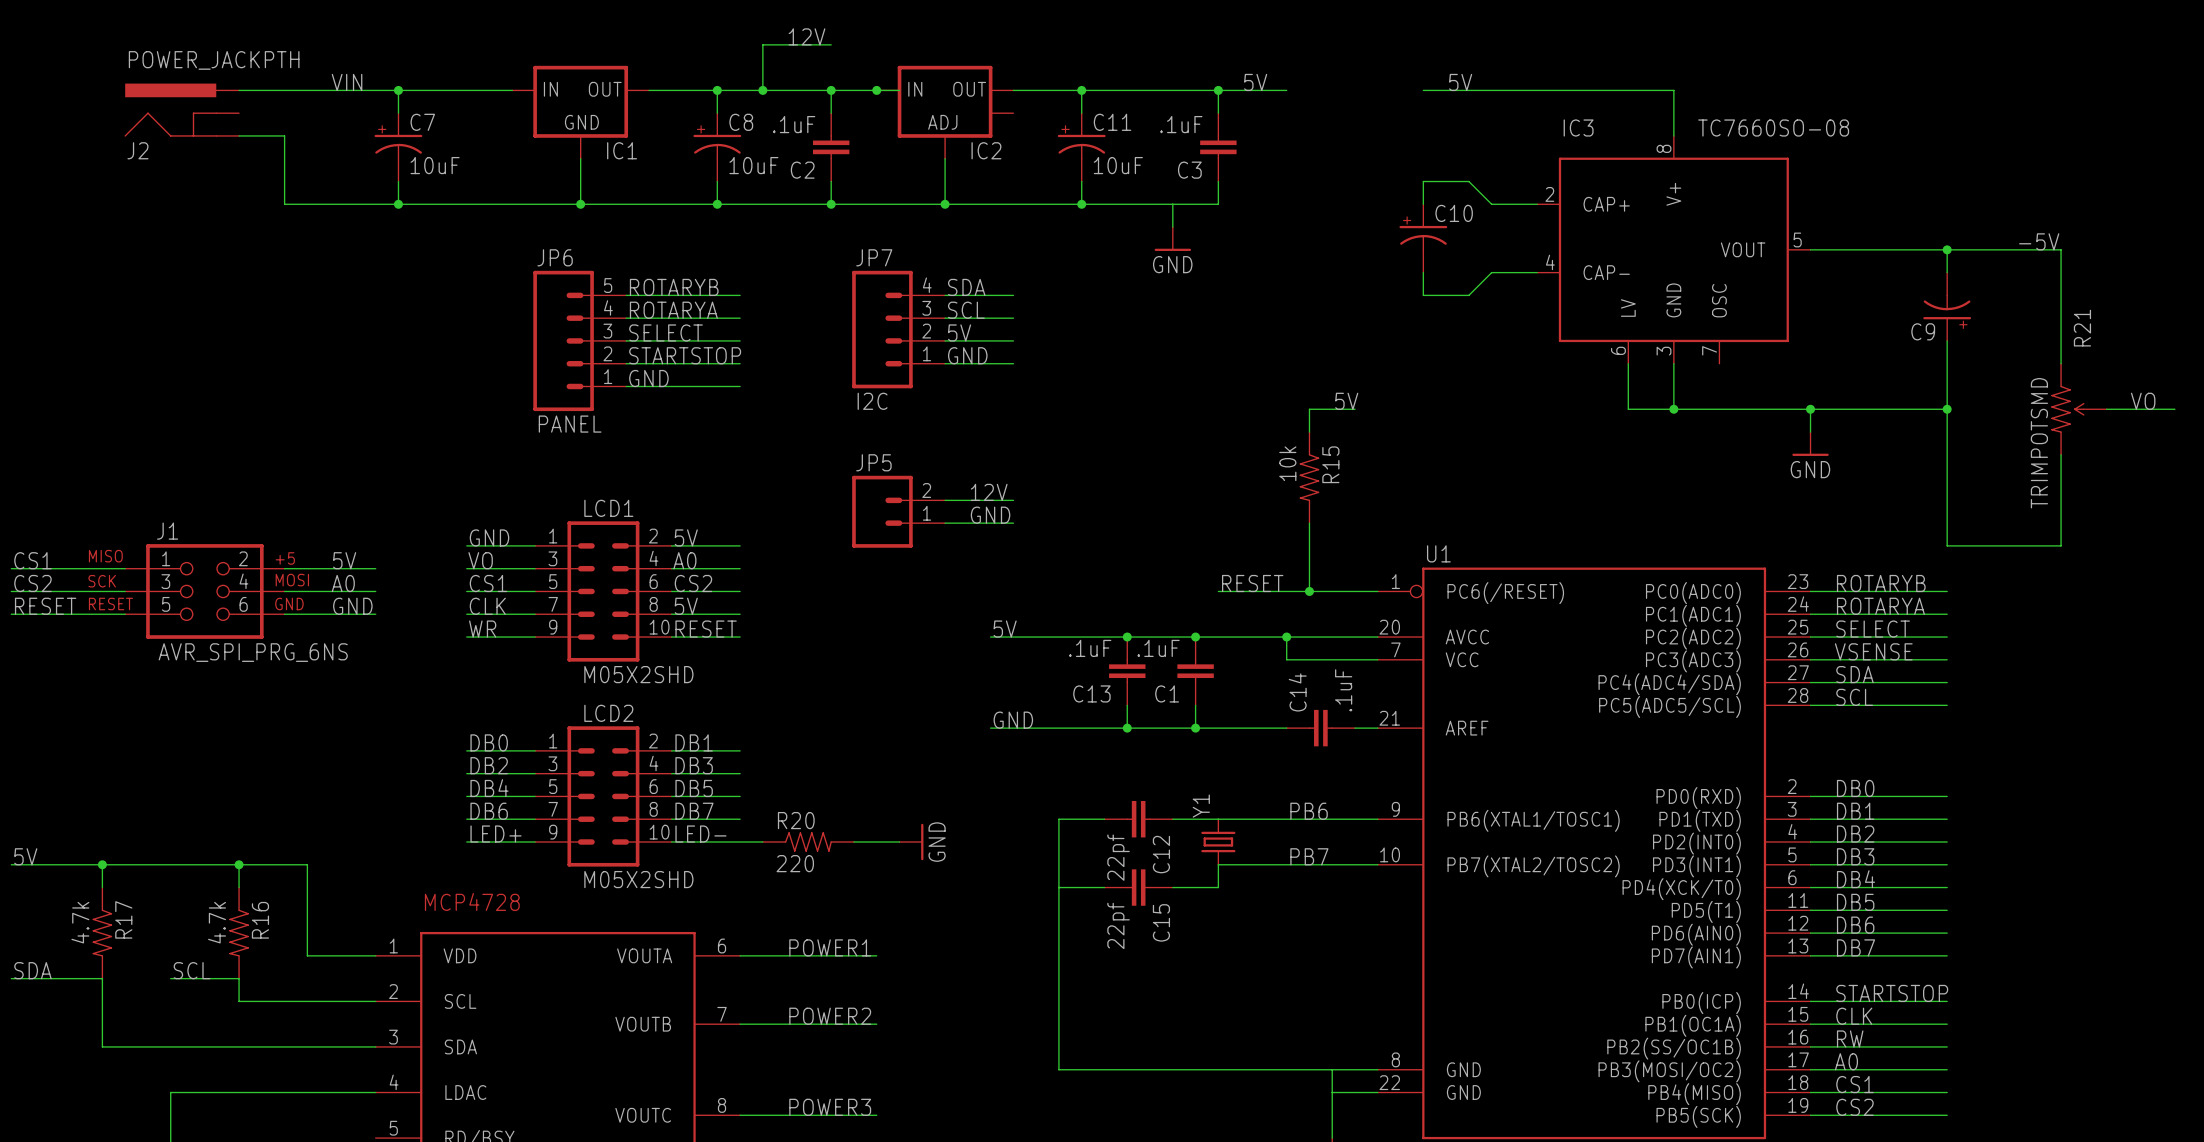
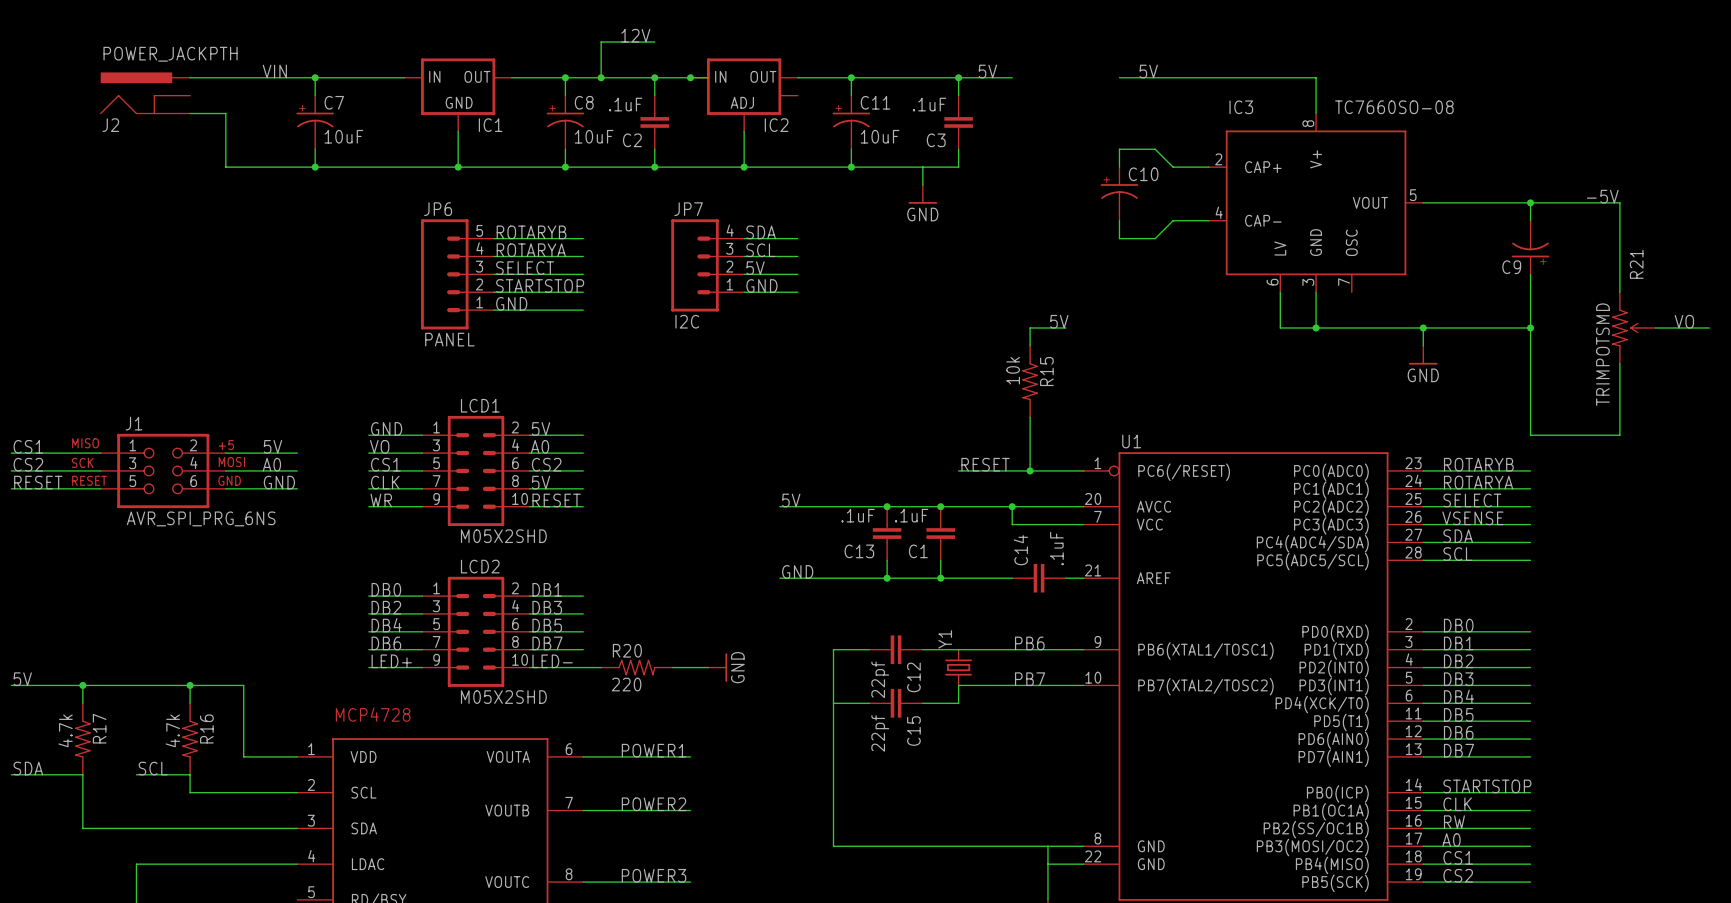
label: 12V (989, 492) -> none
wire: (945, 500) (1013, 500) -> none
JP5: (898, 511) -> none
label: GND (990, 515) -> none
wire: (945, 523) (1013, 523) -> none

